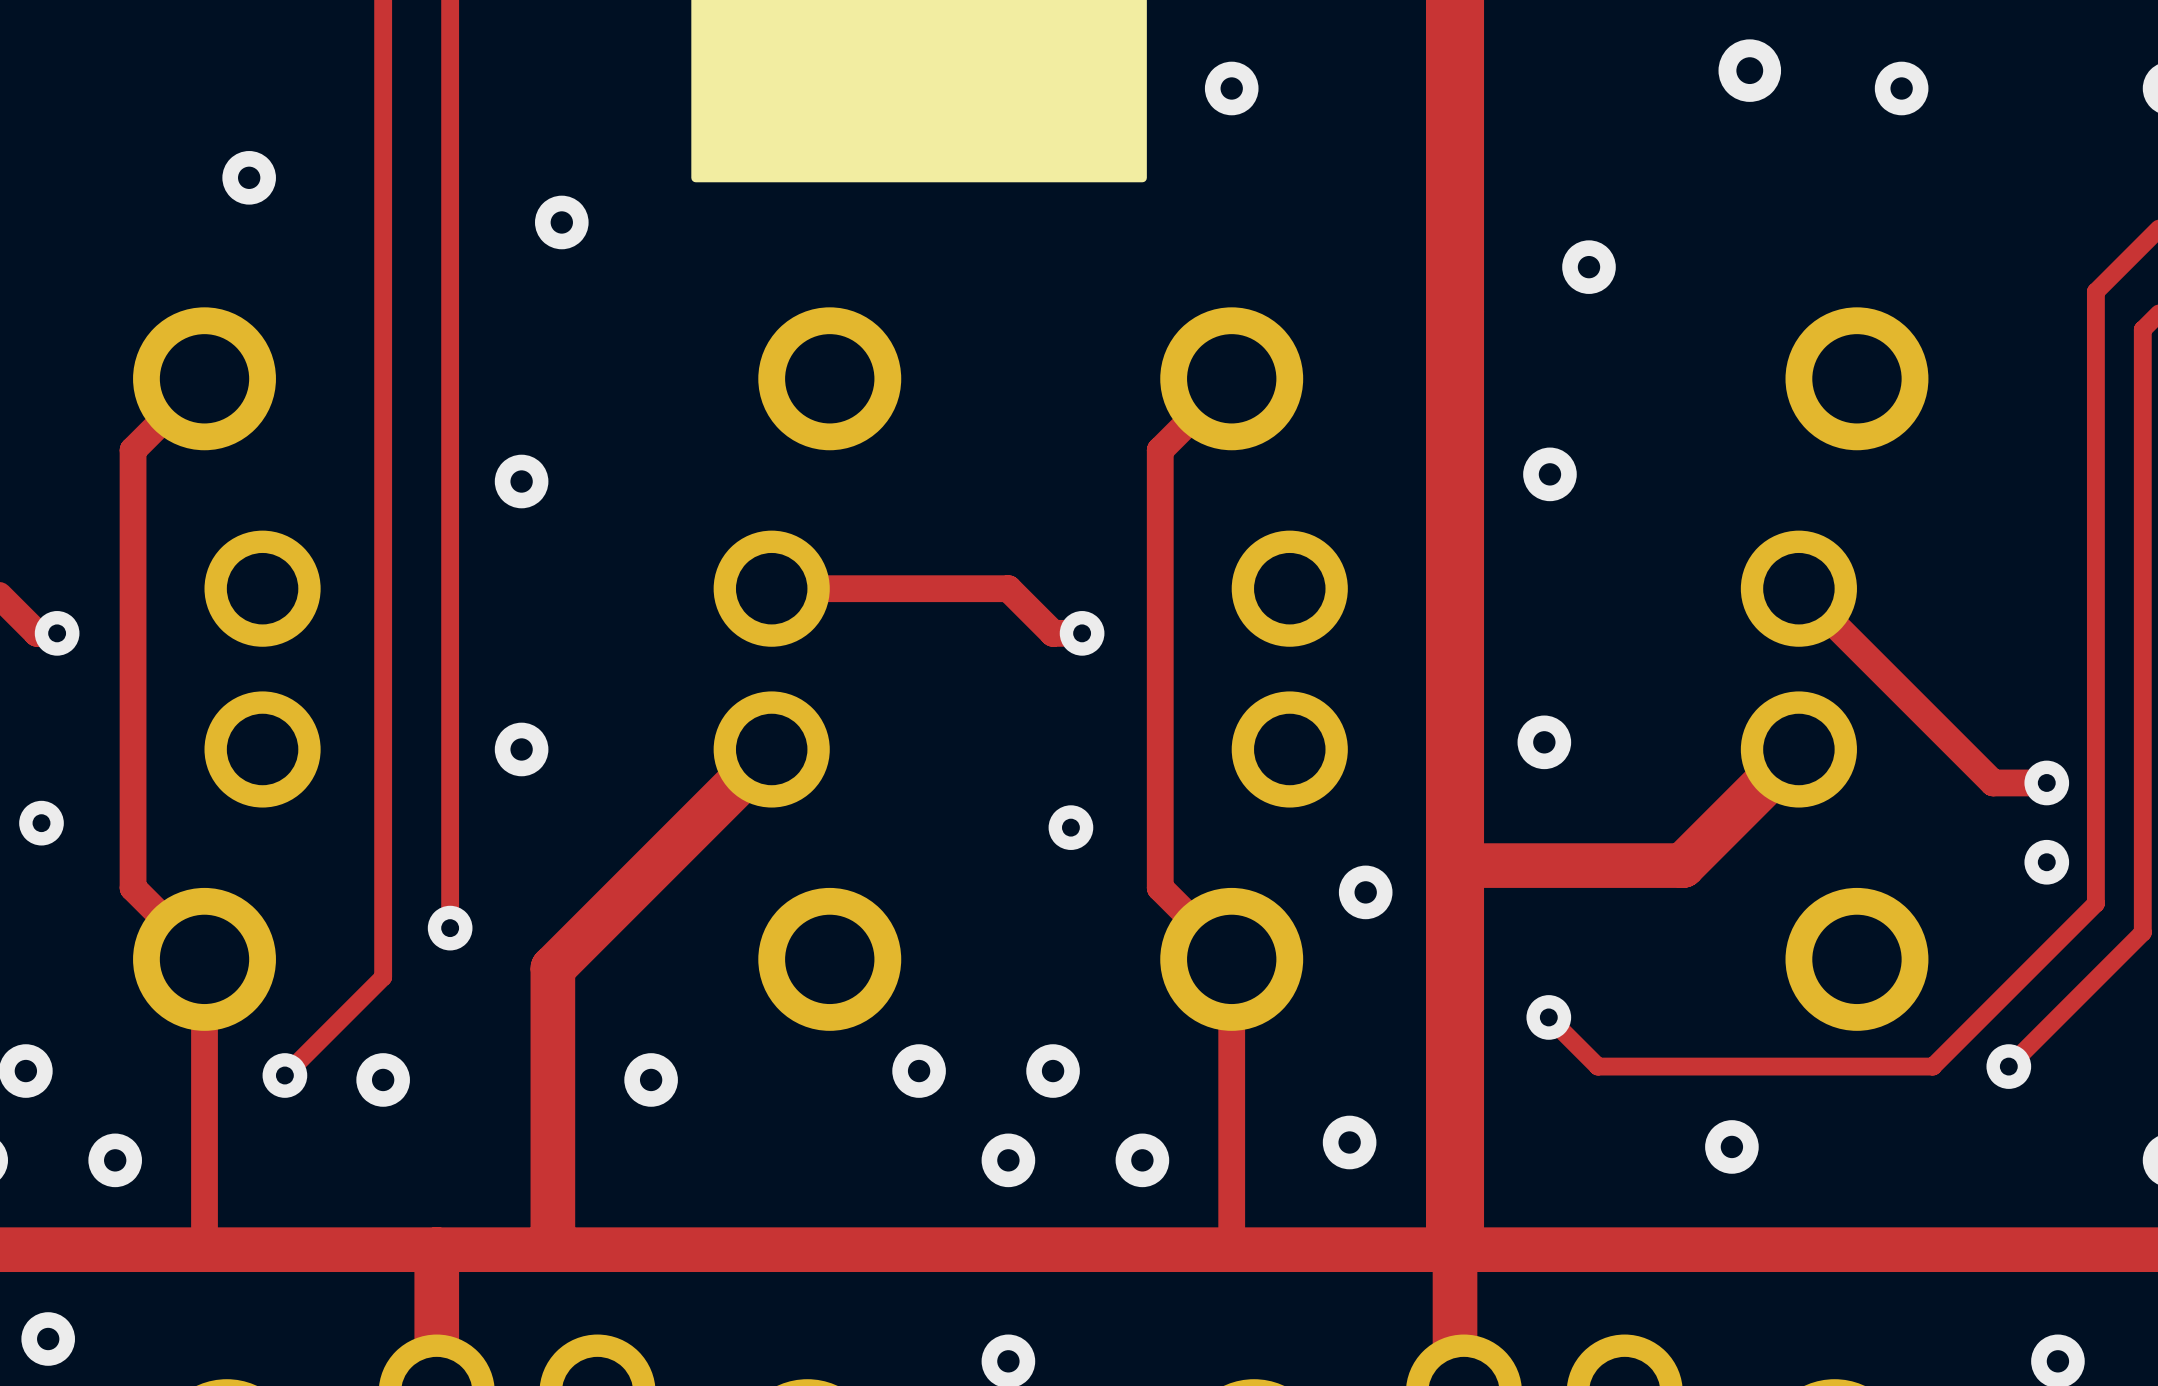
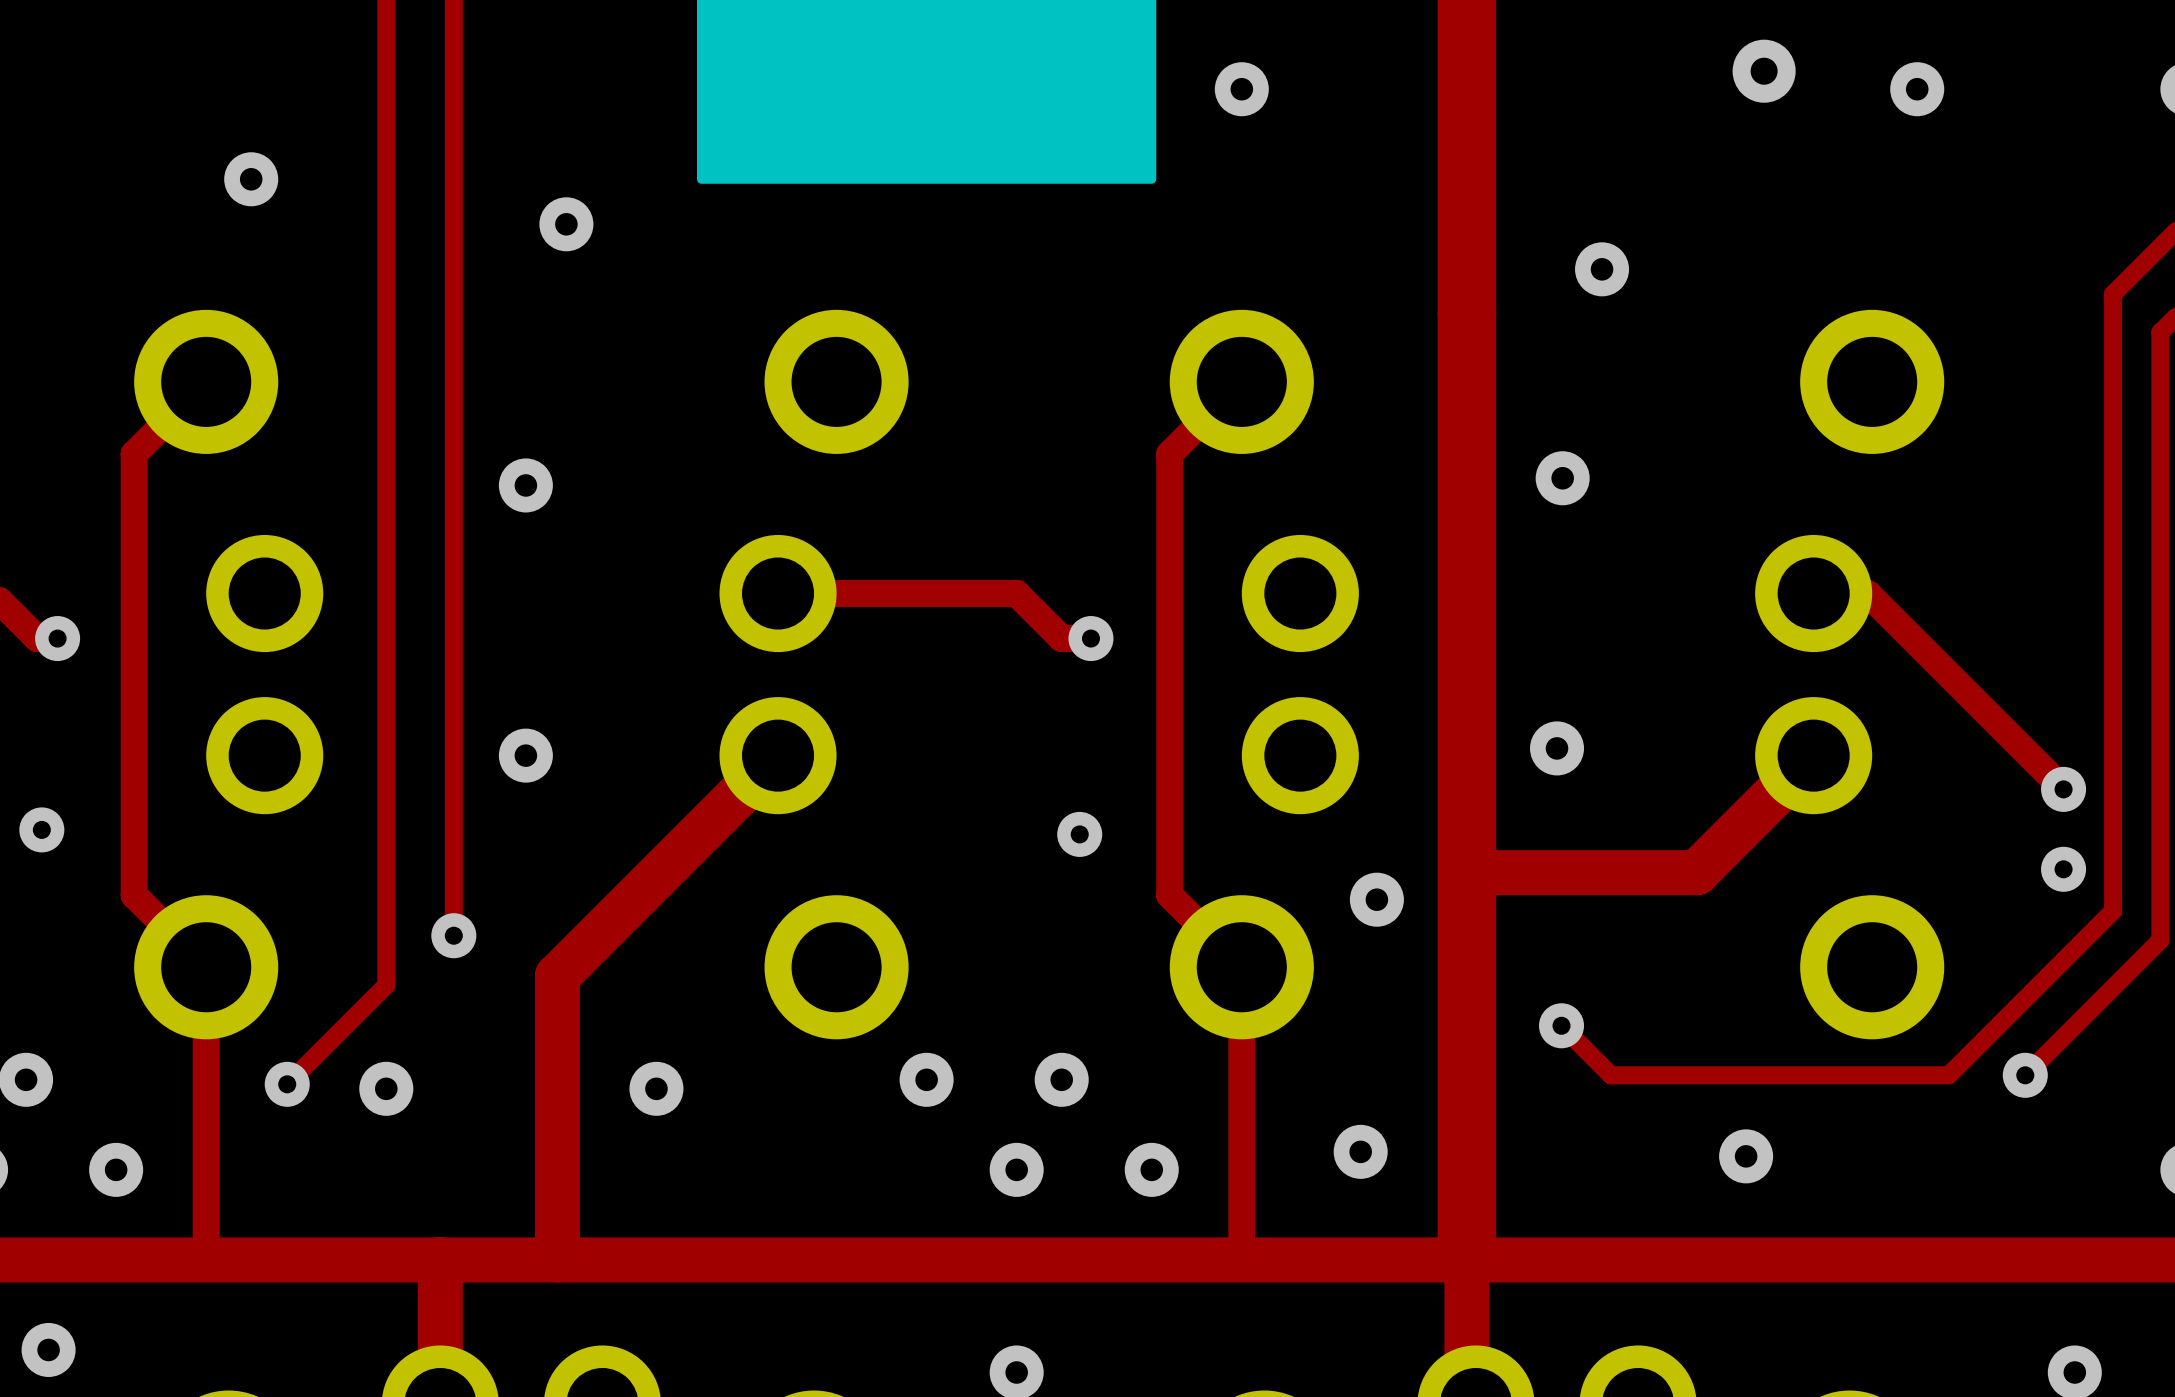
track: (1798, 588) (1993, 782) (2046, 782) -> (1813, 593) (1867, 593) (2063, 789)

